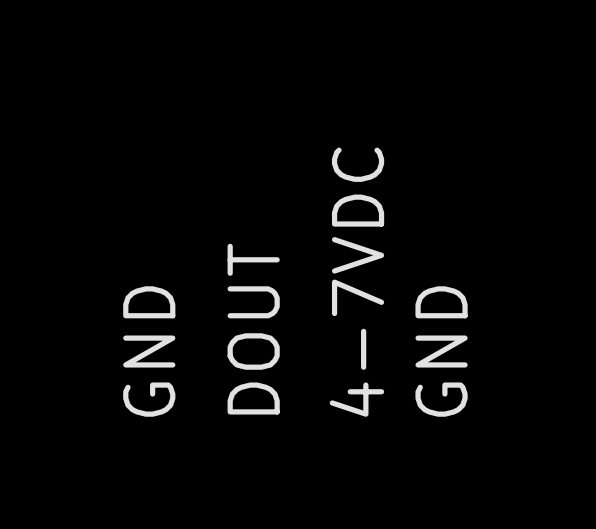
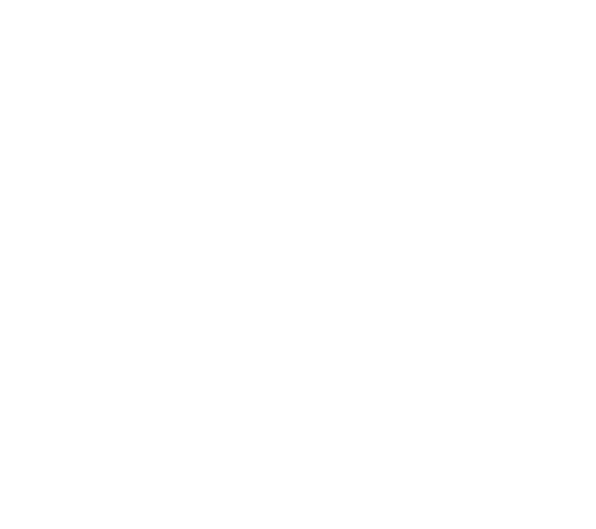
text: 4-7VDC (356, 282) -> none
text: DOUT (253, 329) -> none
text: GND (149, 351) -> none
text: GND (441, 351) -> none

